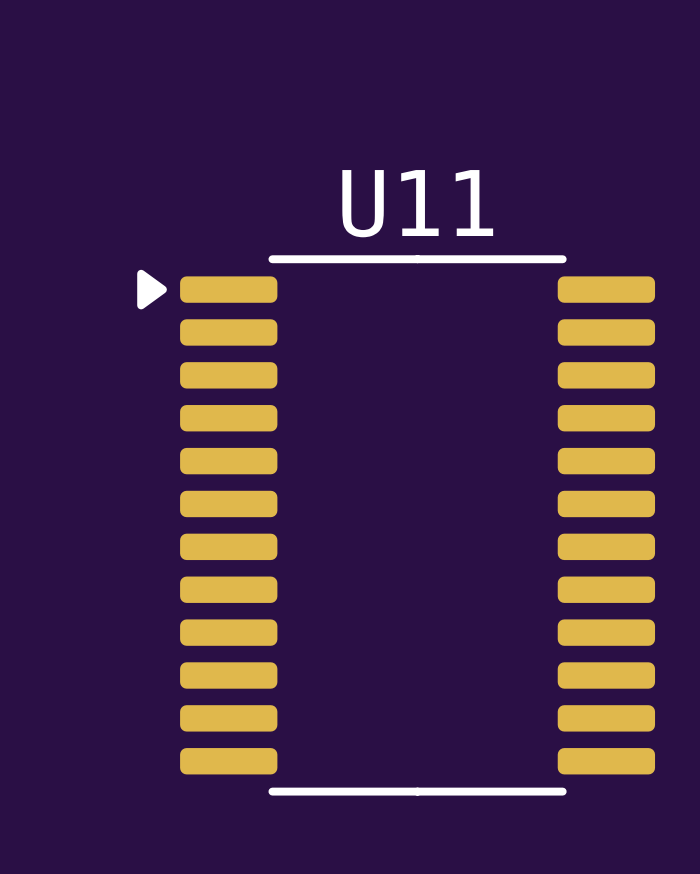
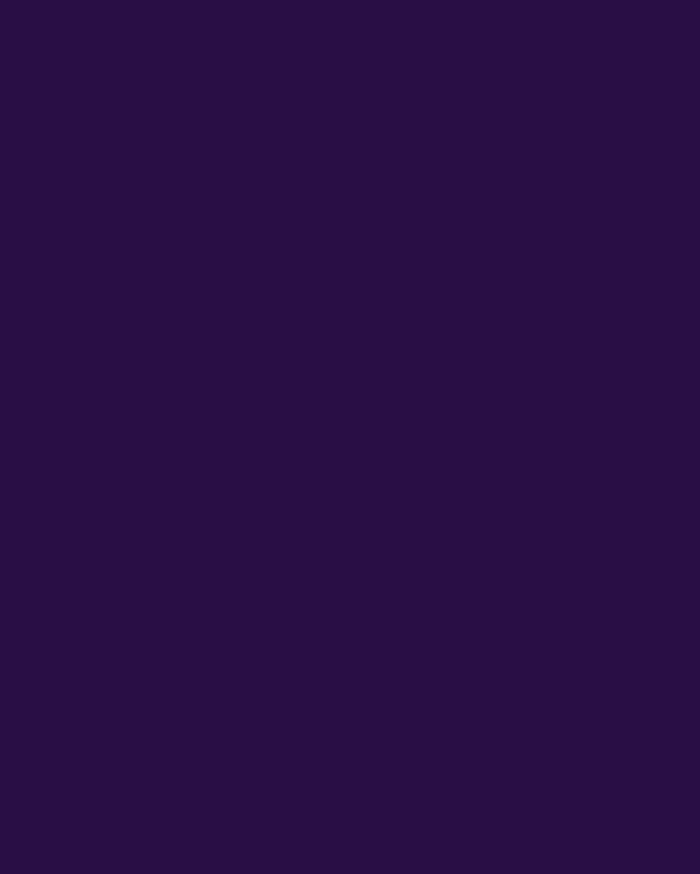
U11: (396, 525) -> none

